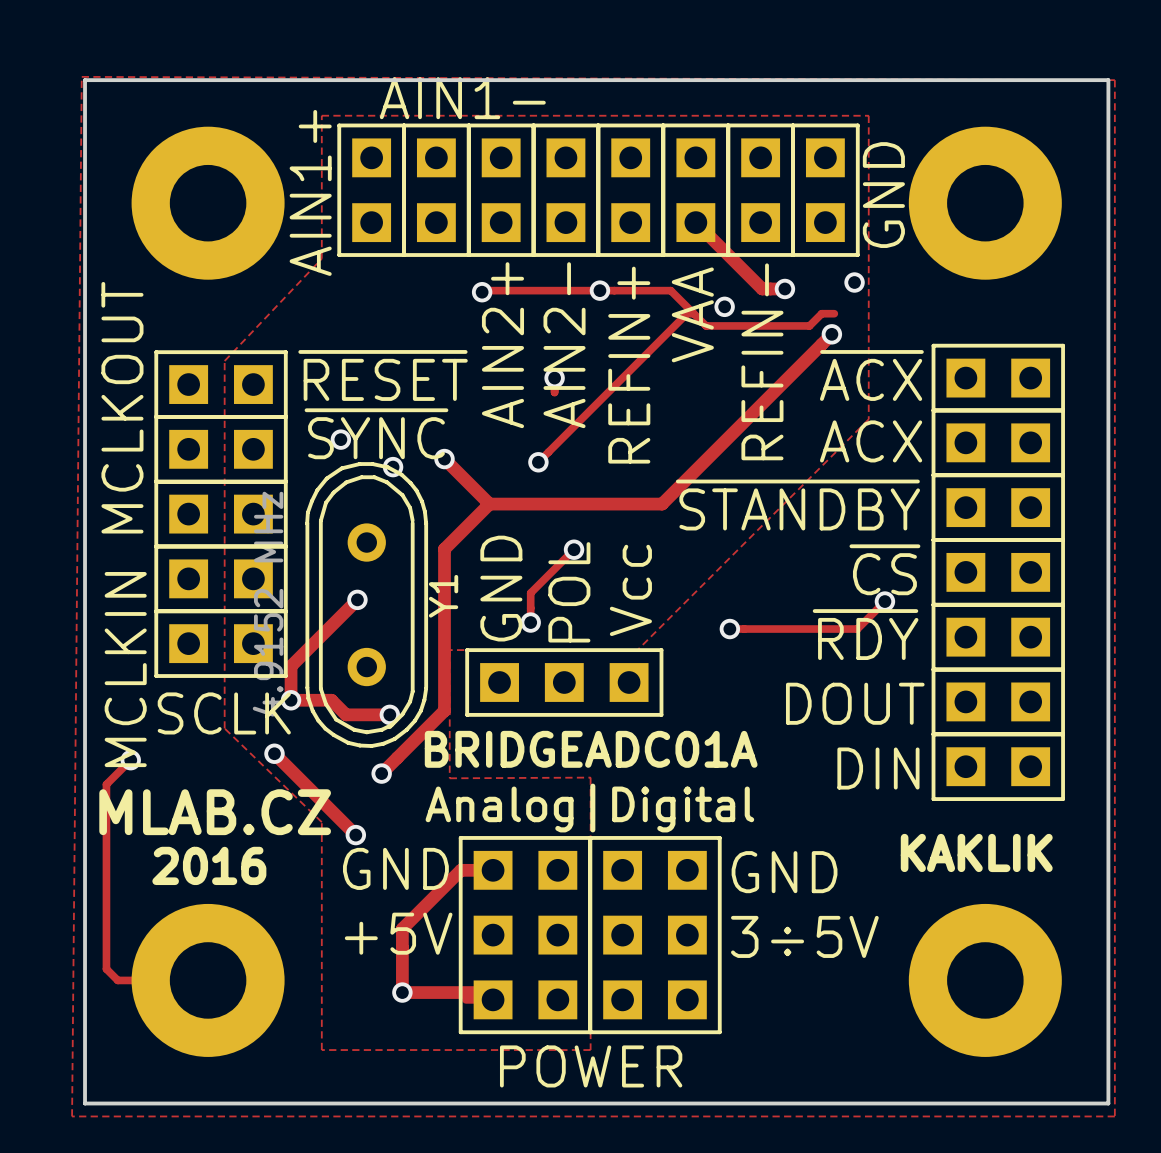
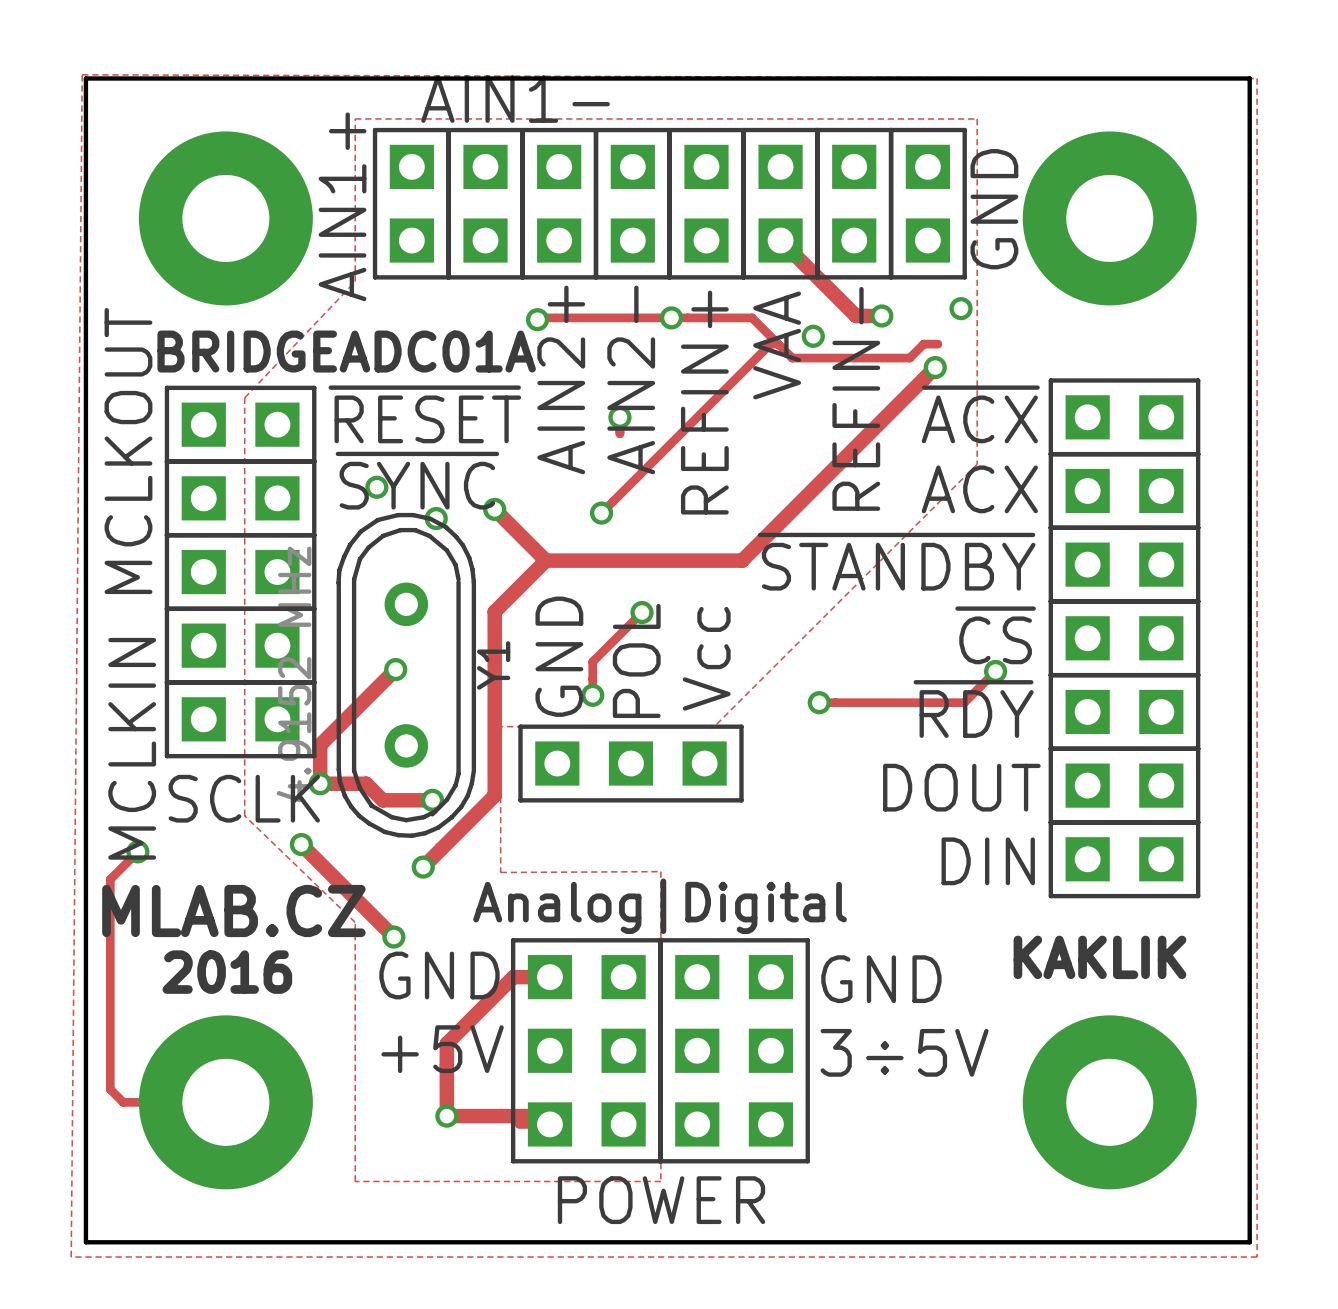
text position: BRIDGEADC01A (591, 749) -> BRIDGEADC01A (346, 351)

